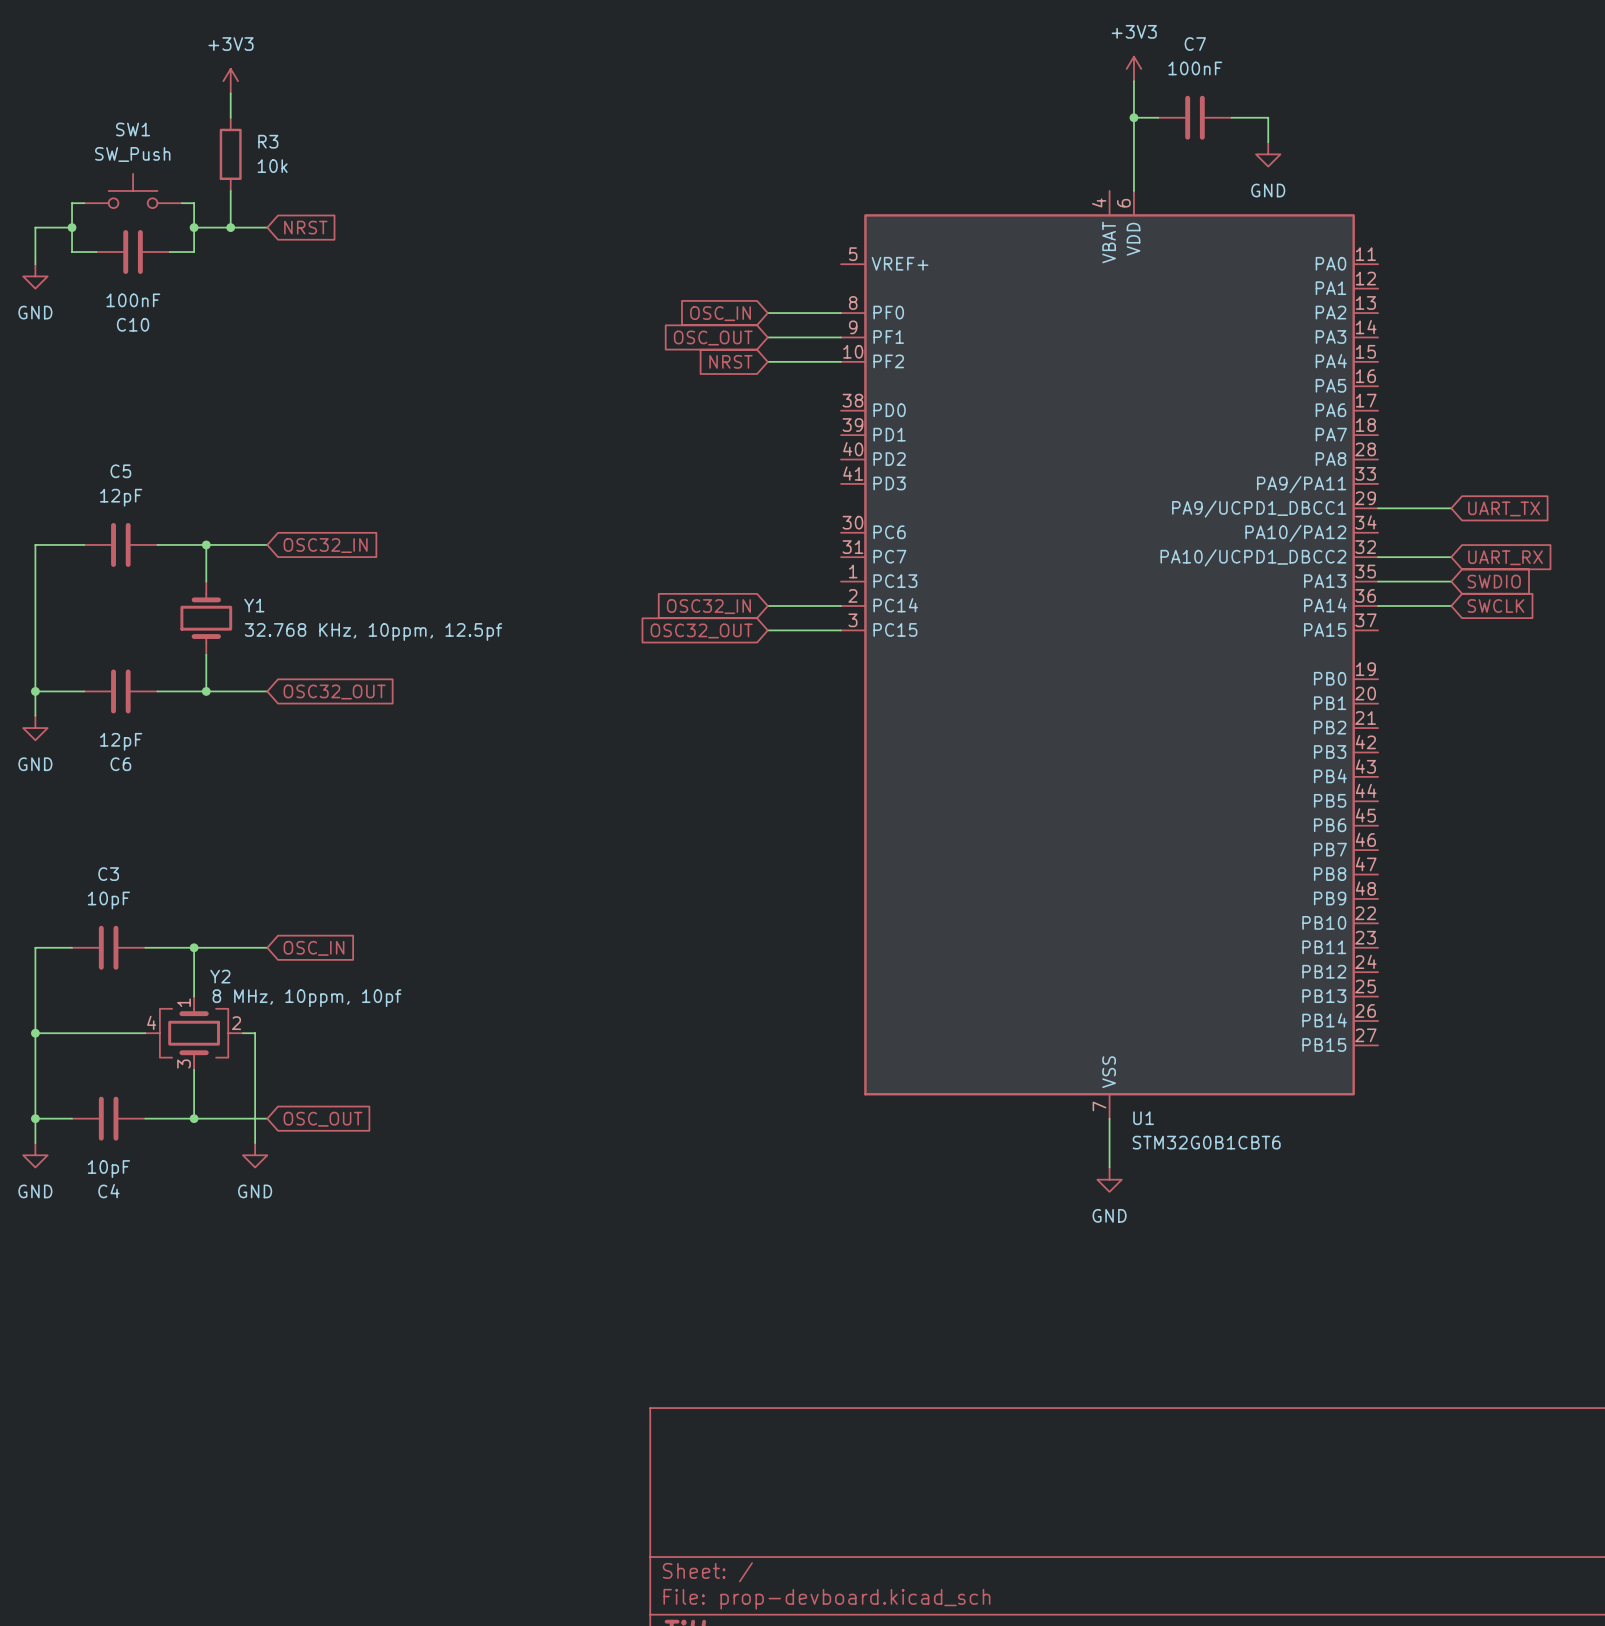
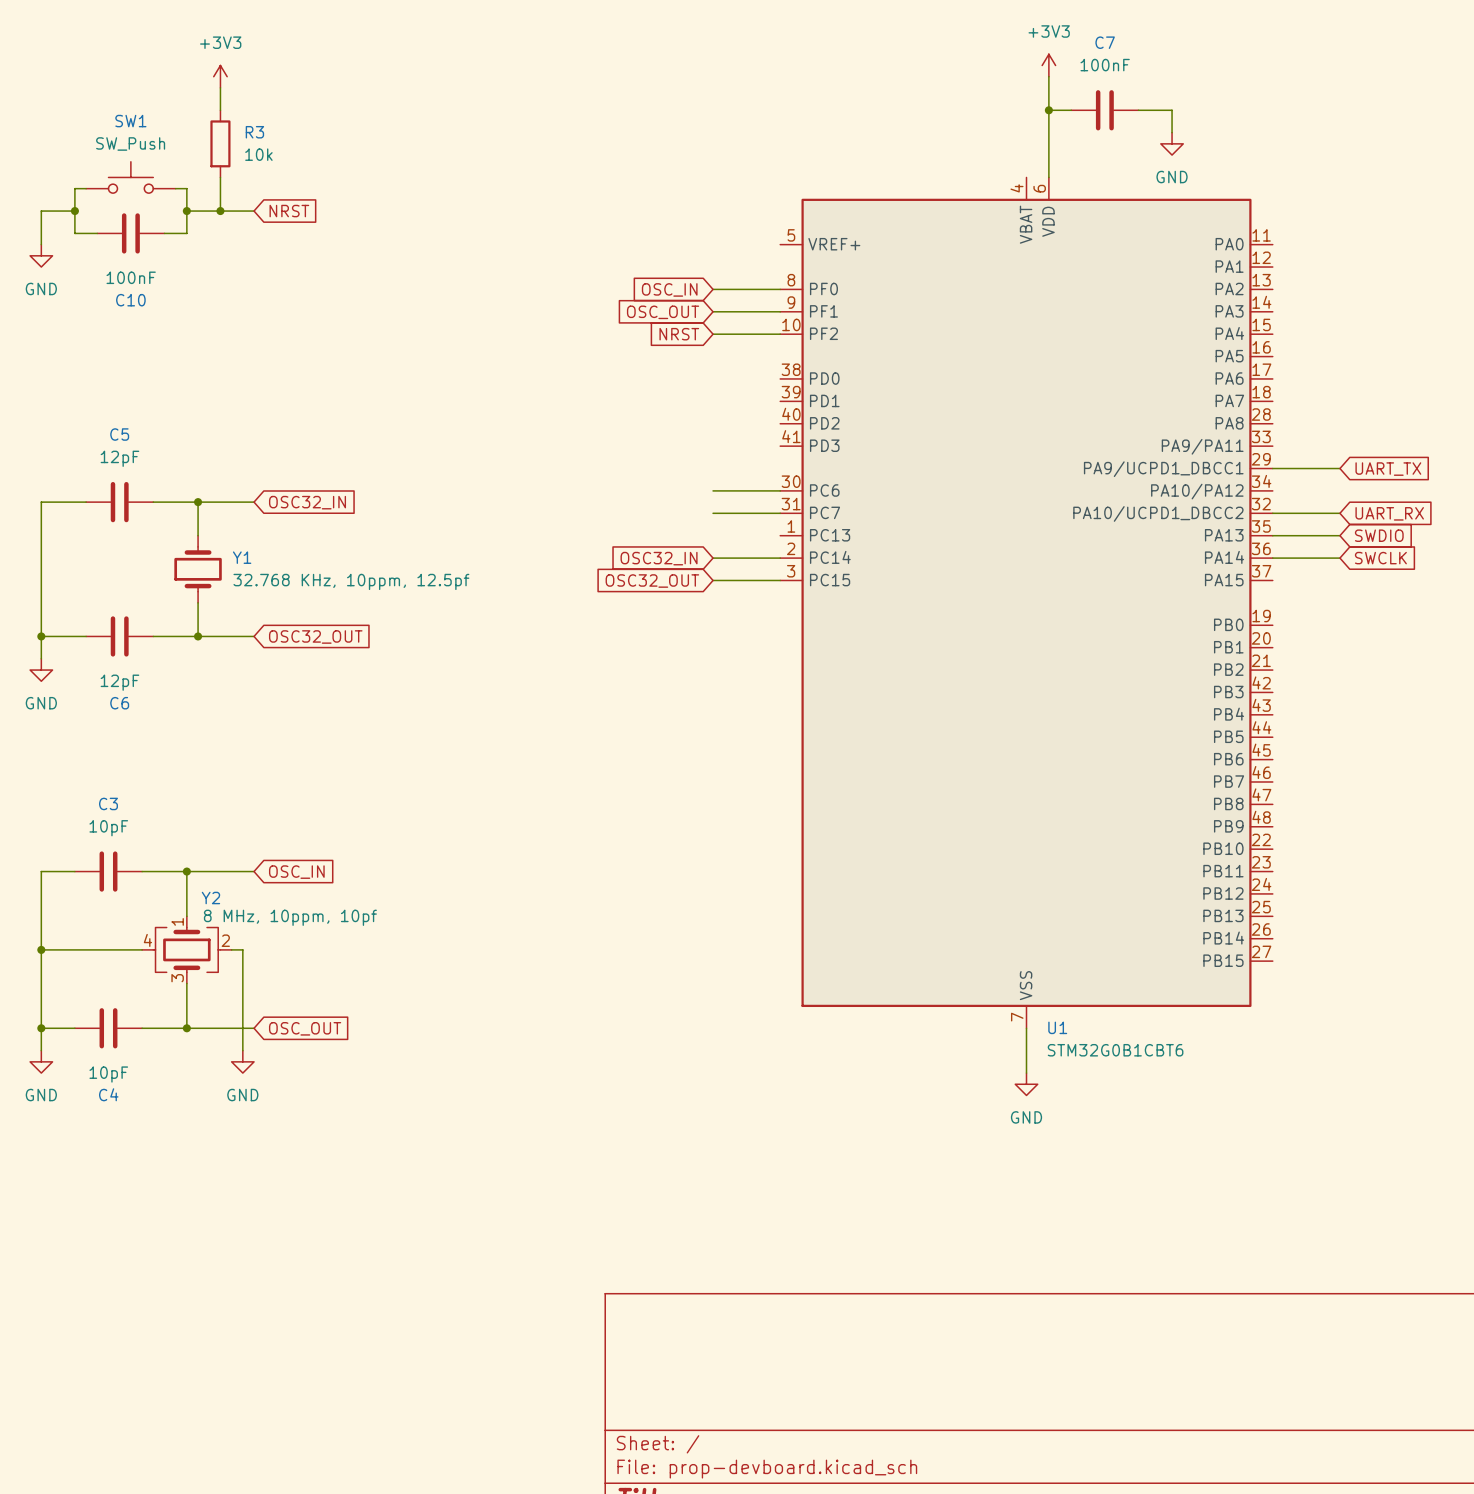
wire: none -> (713, 490) (780, 490)
wire: none -> (713, 513) (780, 513)

